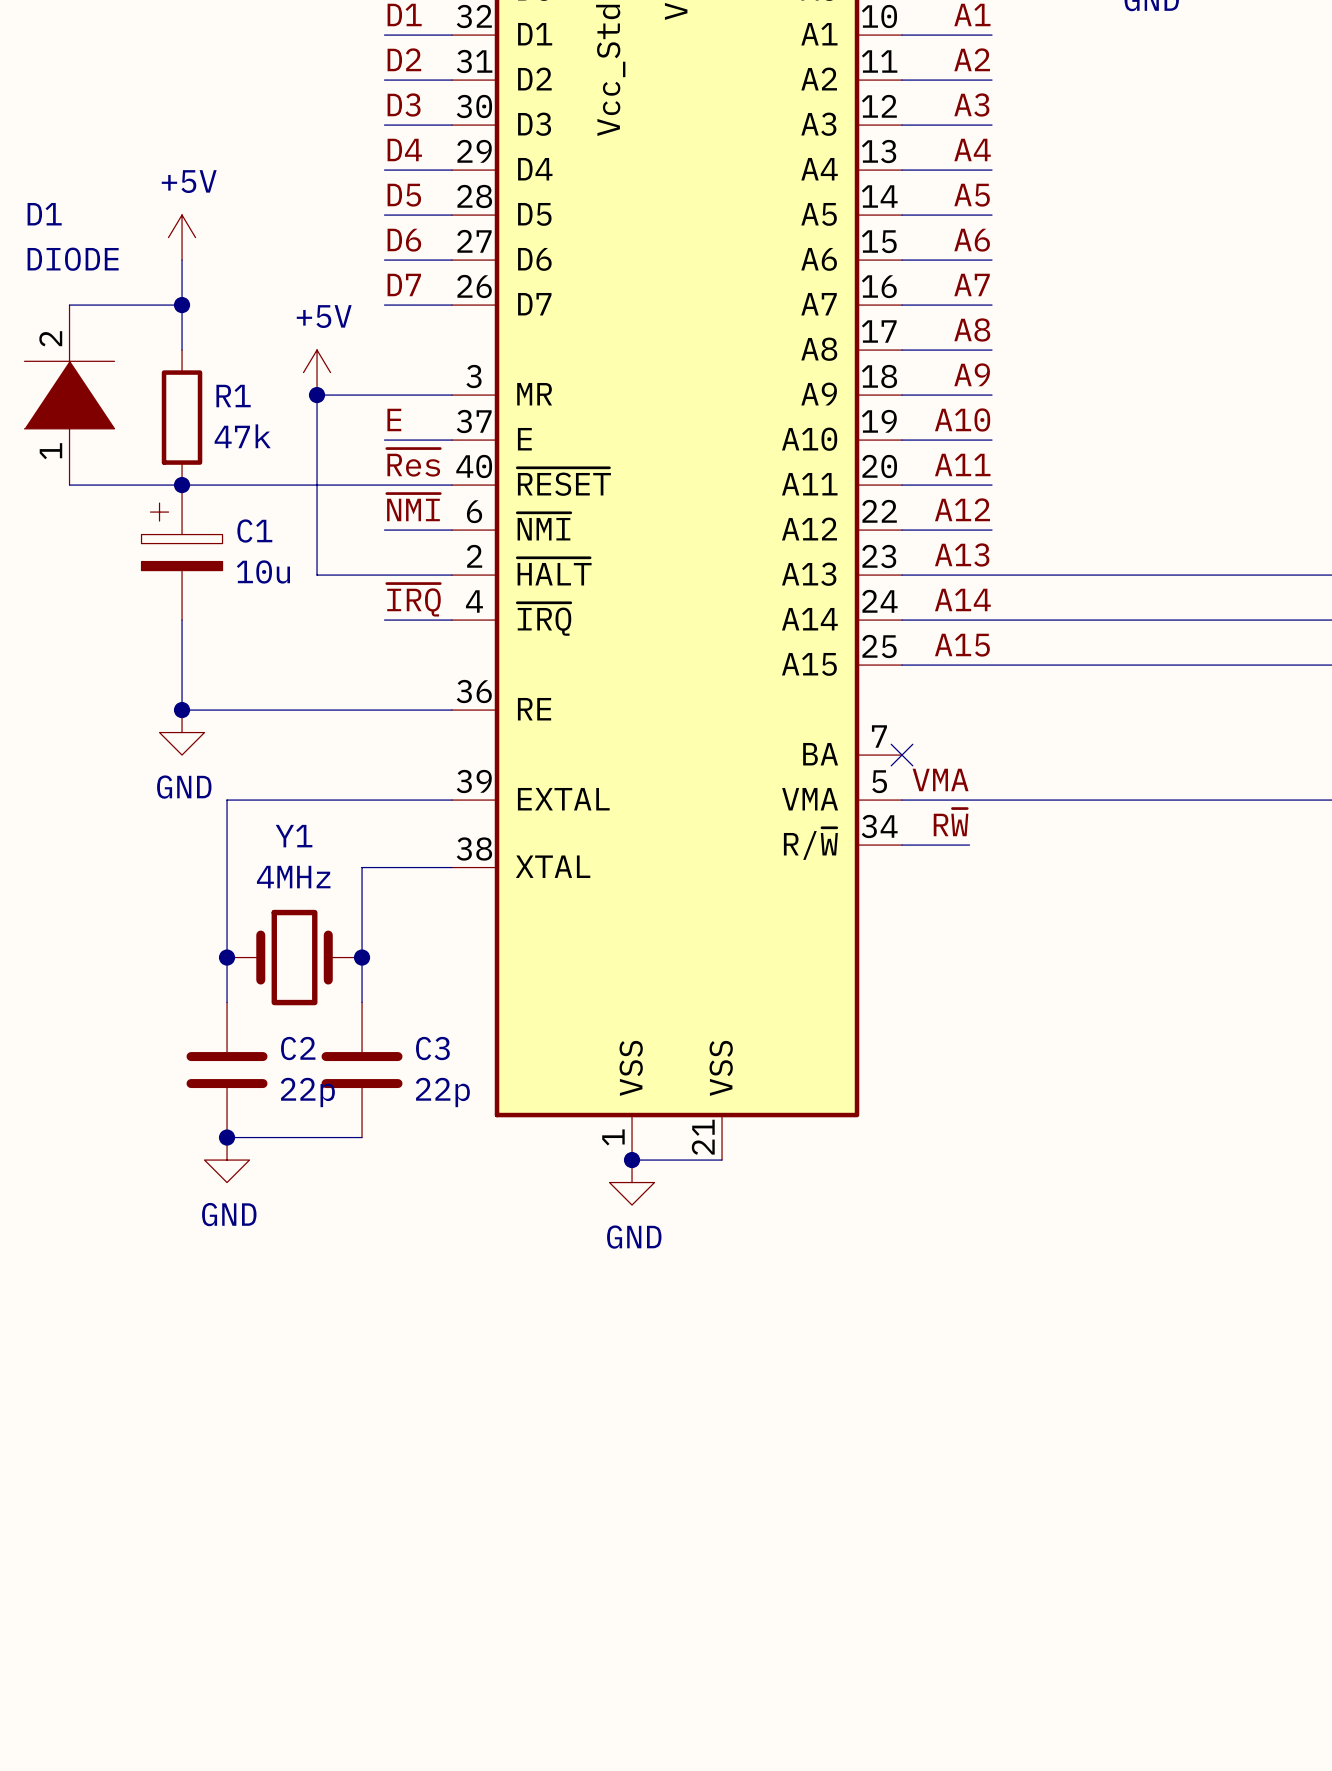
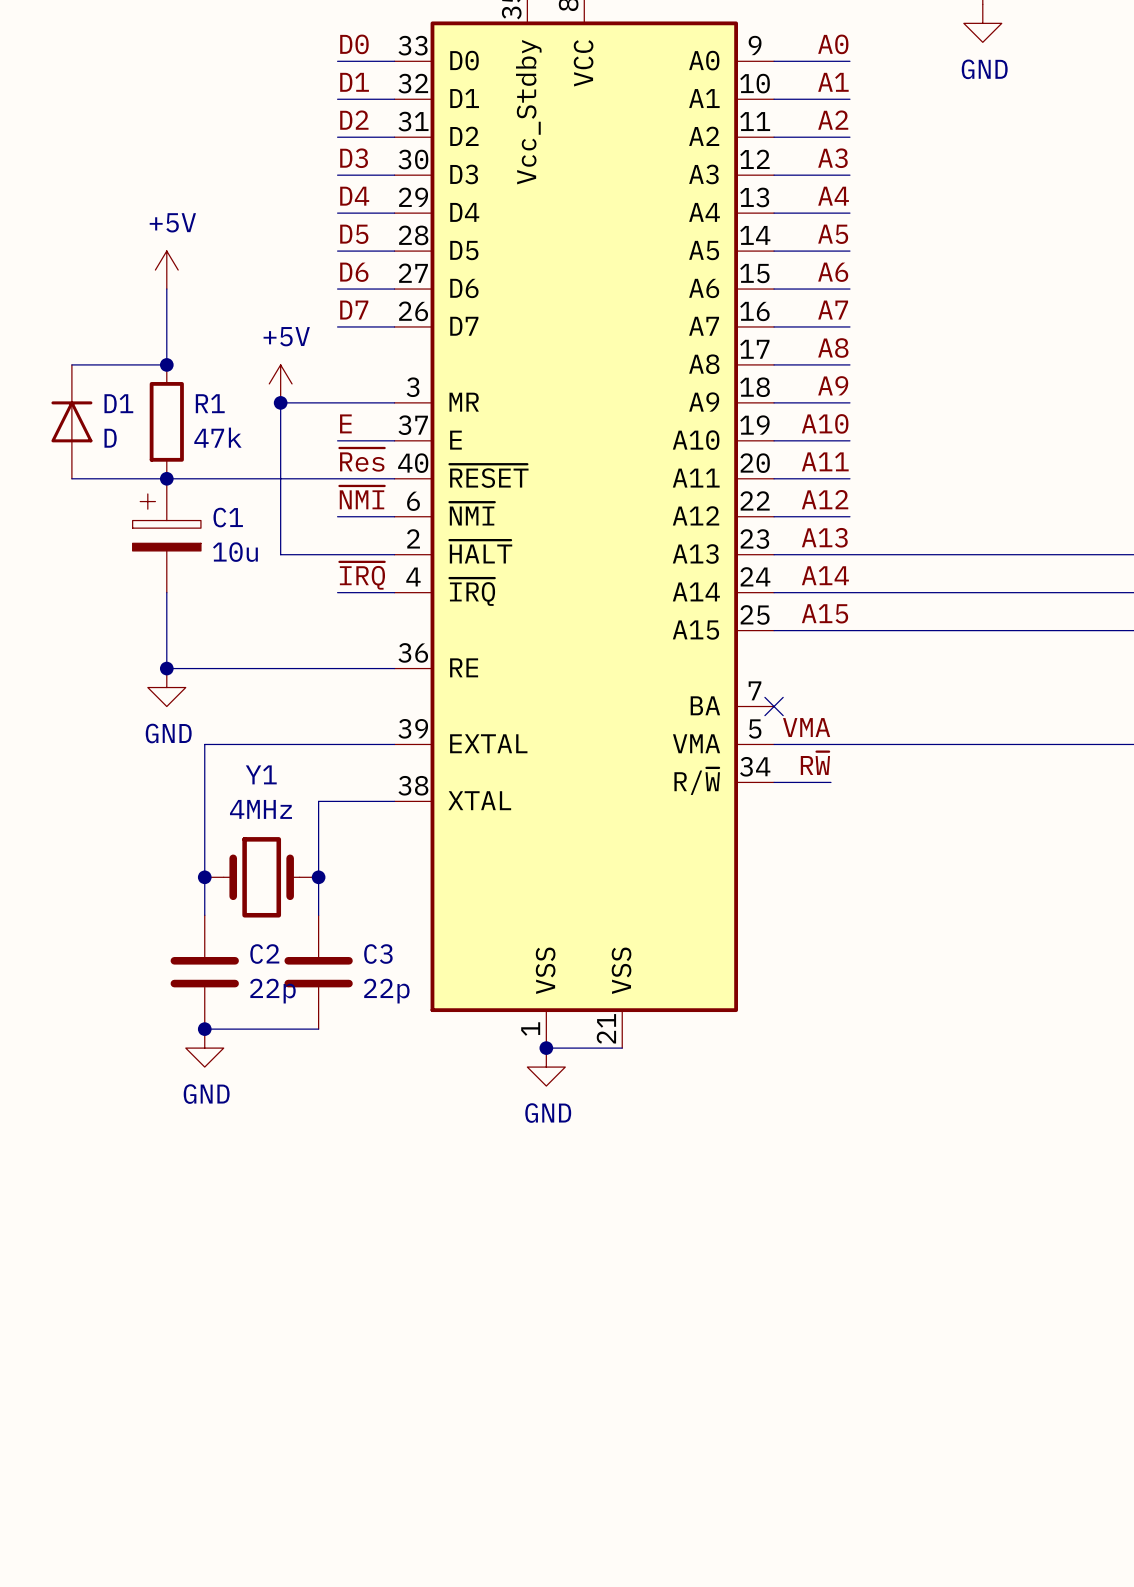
D1 name position: D1 (44, 214) -> D1 (118, 403)
D1 value: DIODE (73, 259) -> D (110, 438)
D1 symbol: [24, 305, 115, 486] -> [51, 364, 93, 479]
wire: (69, 305) (182, 305) -> (71, 364) (166, 364)
junction position: (182, 305) -> (166, 364)

